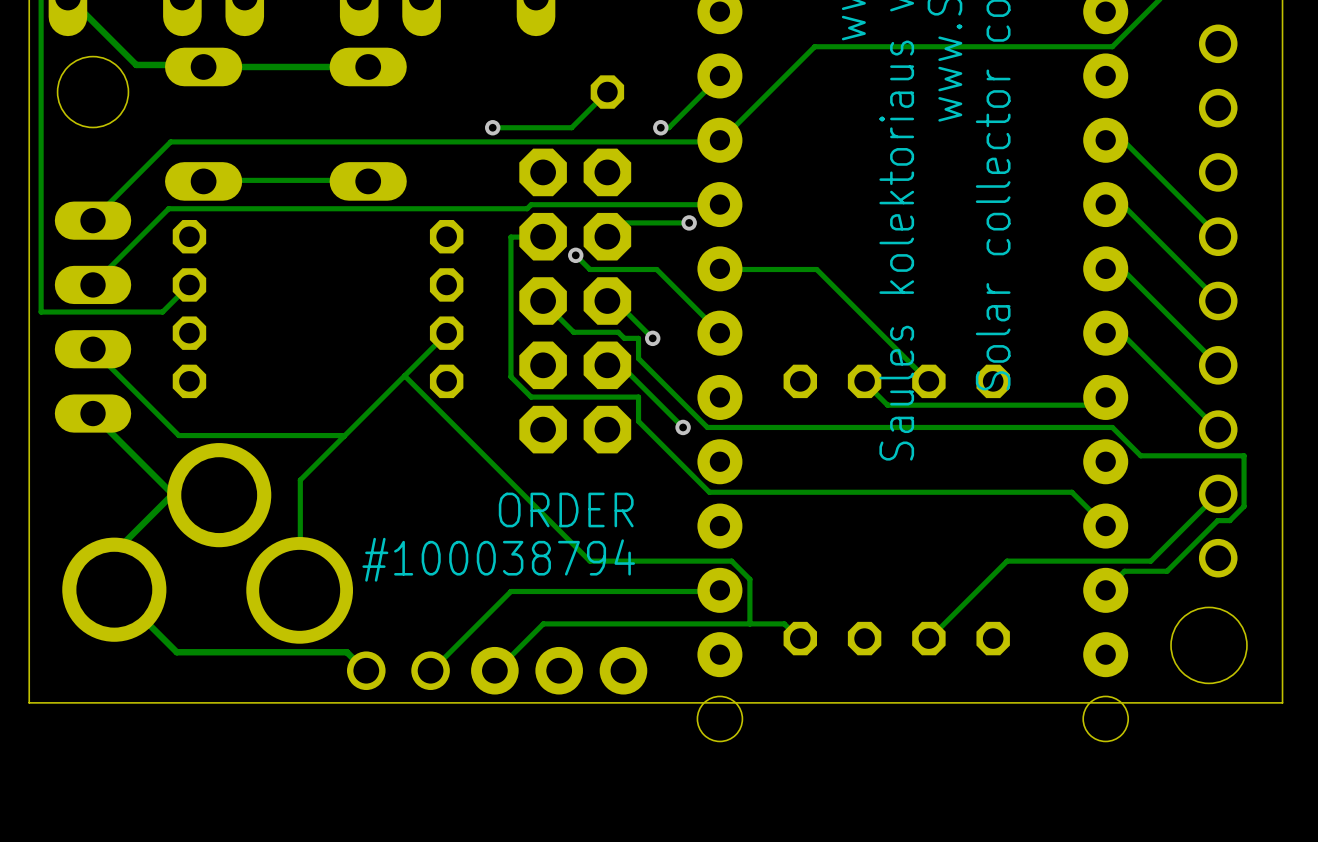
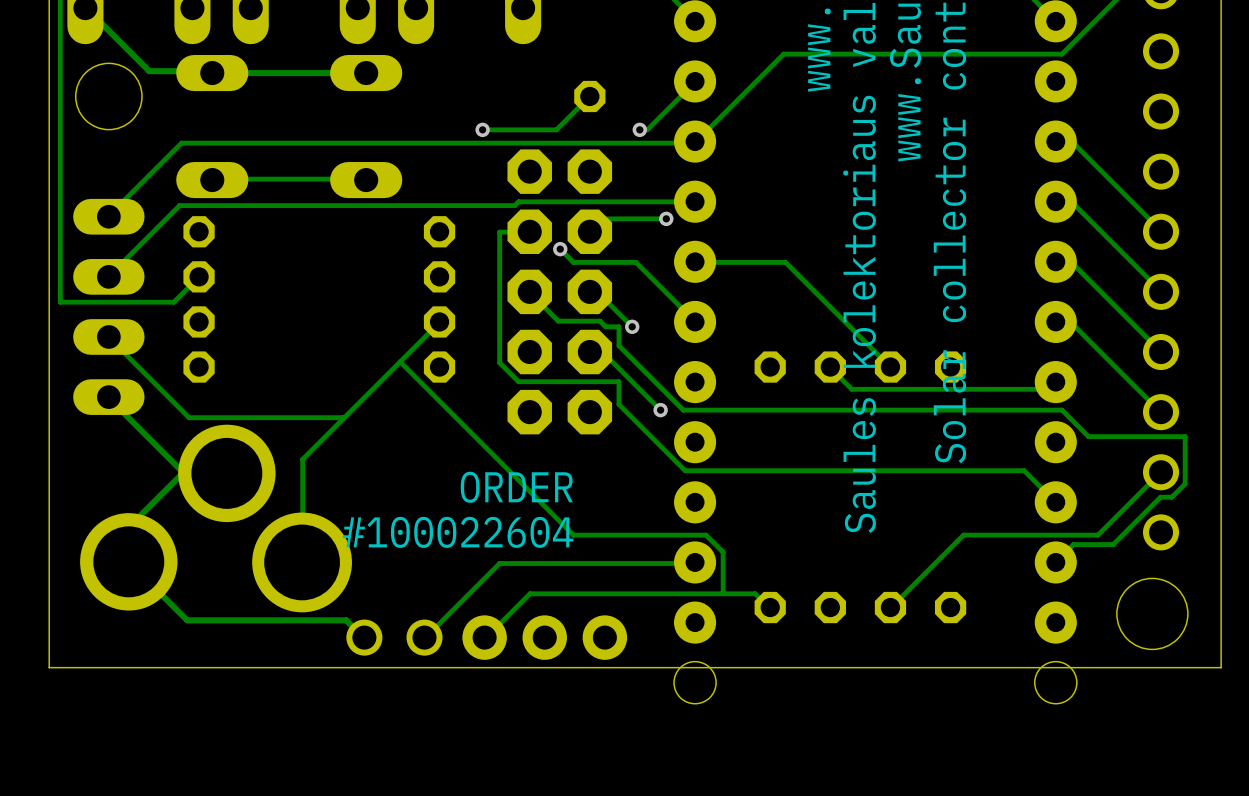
text position: ORDER (566, 509) -> ORDER (516, 487)
text: none -> #100022604 (458, 532)
text: #100038794 (498, 559) -> none

